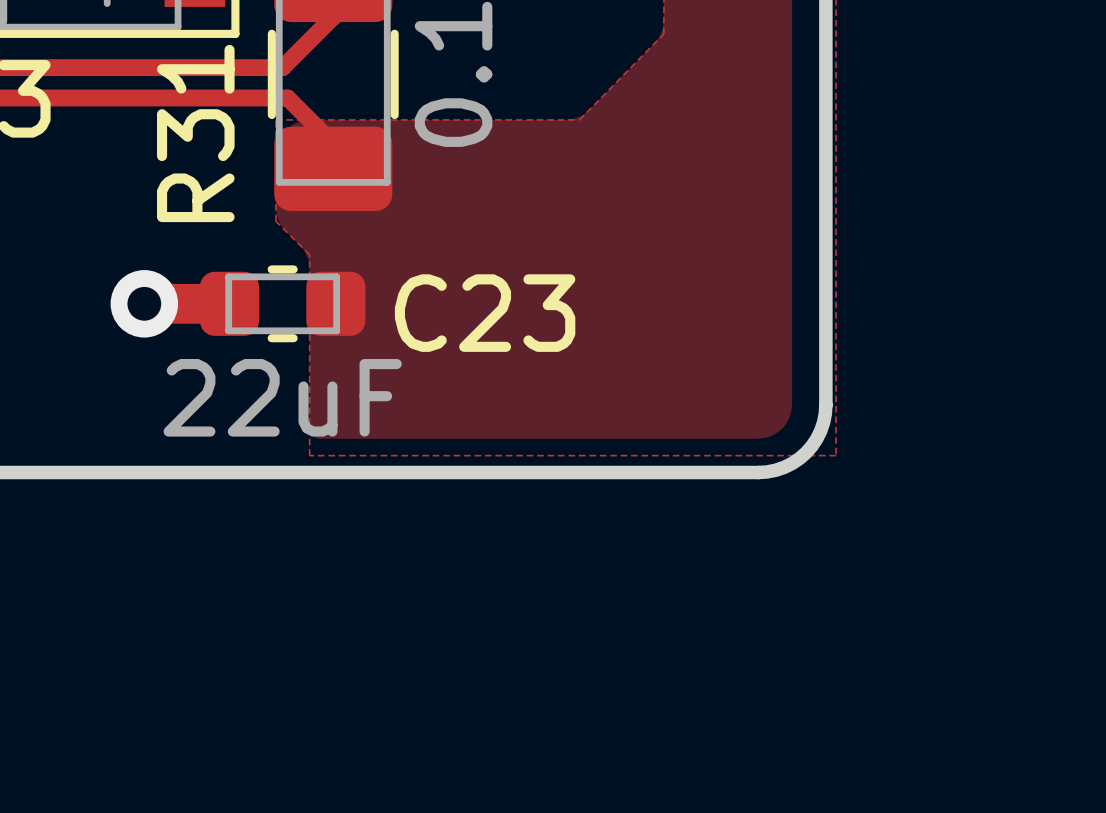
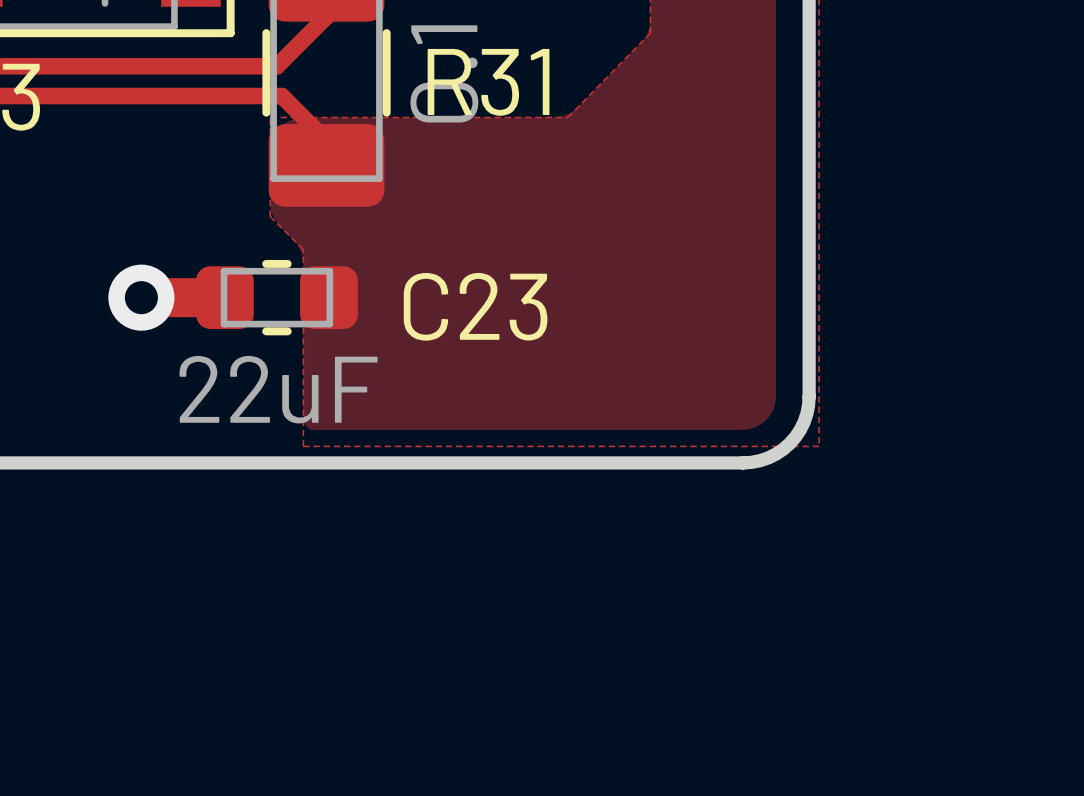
R31 name rotation: 0° (195, 133) -> 90° clockwise (488, 82)
R31 name position: R31 (195, 133) -> R31 (488, 82)

